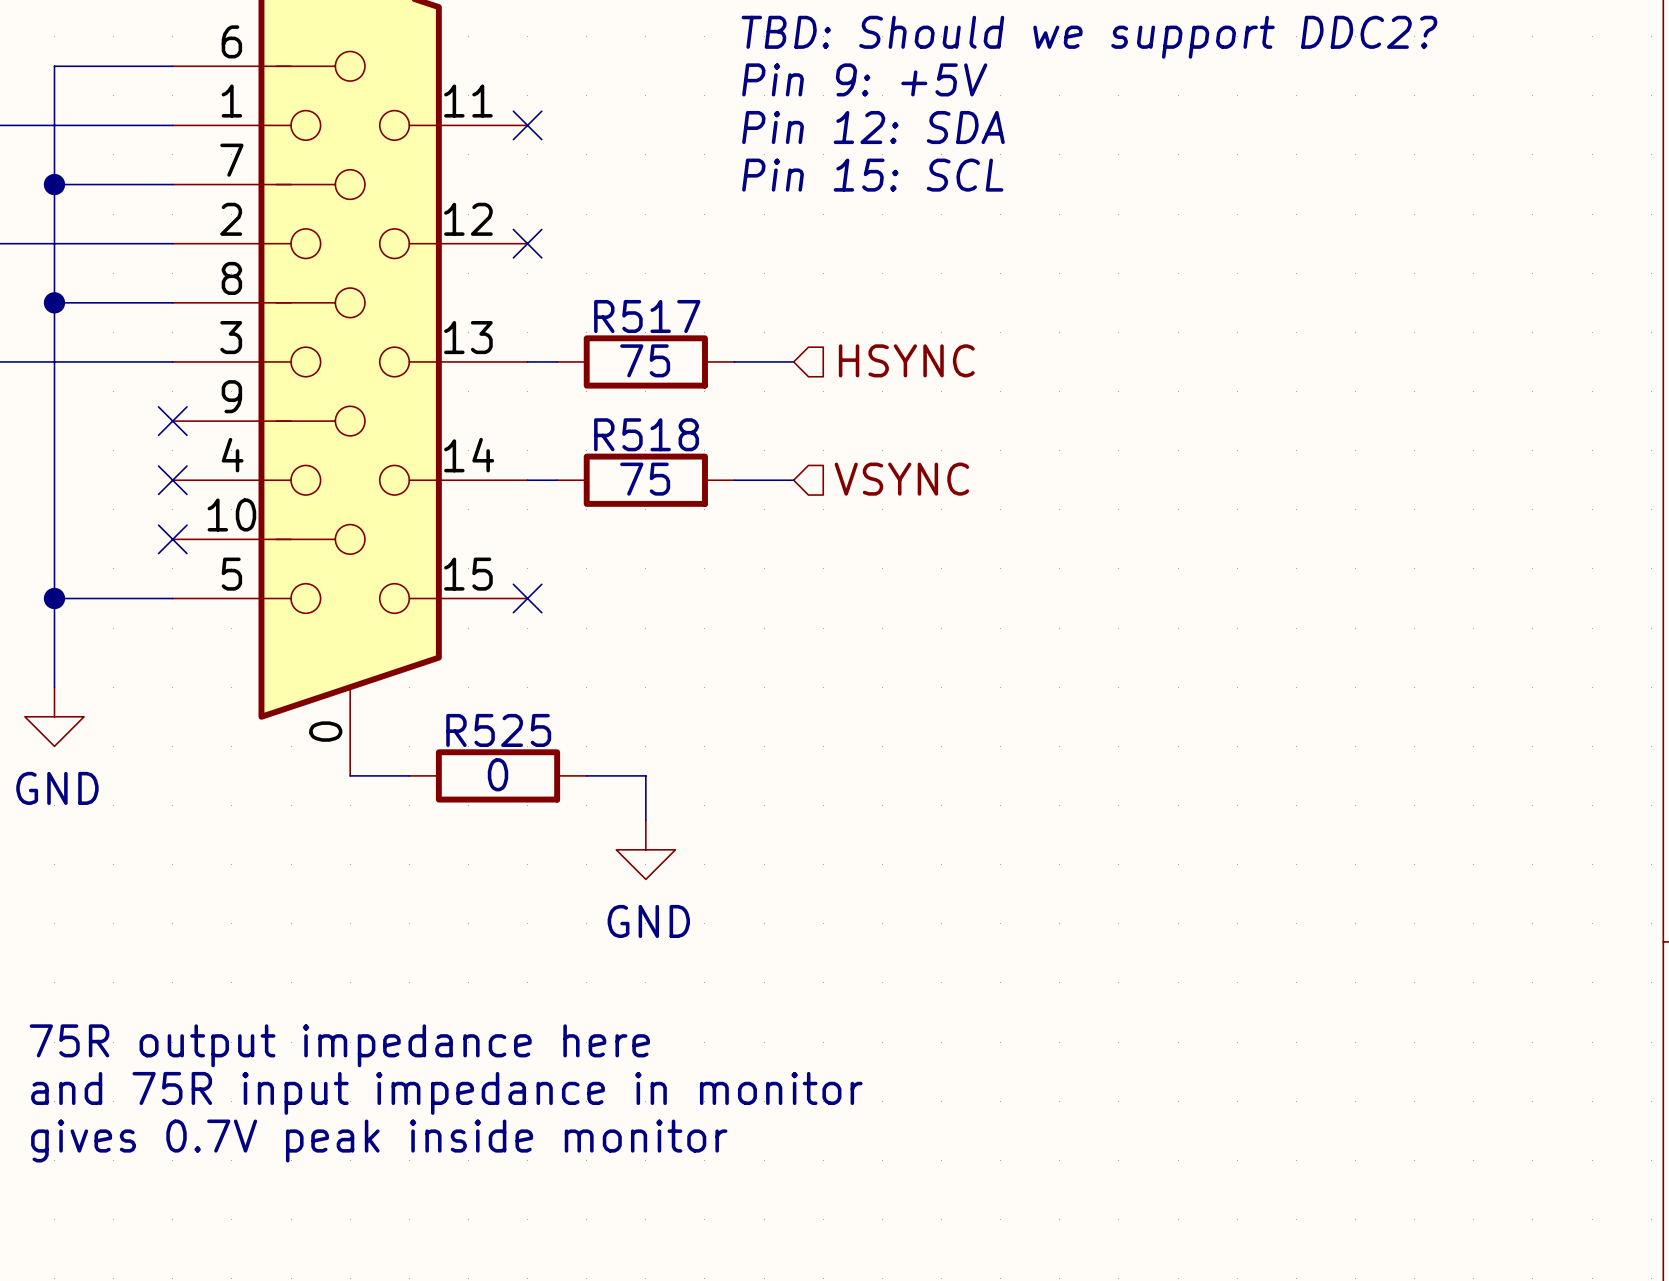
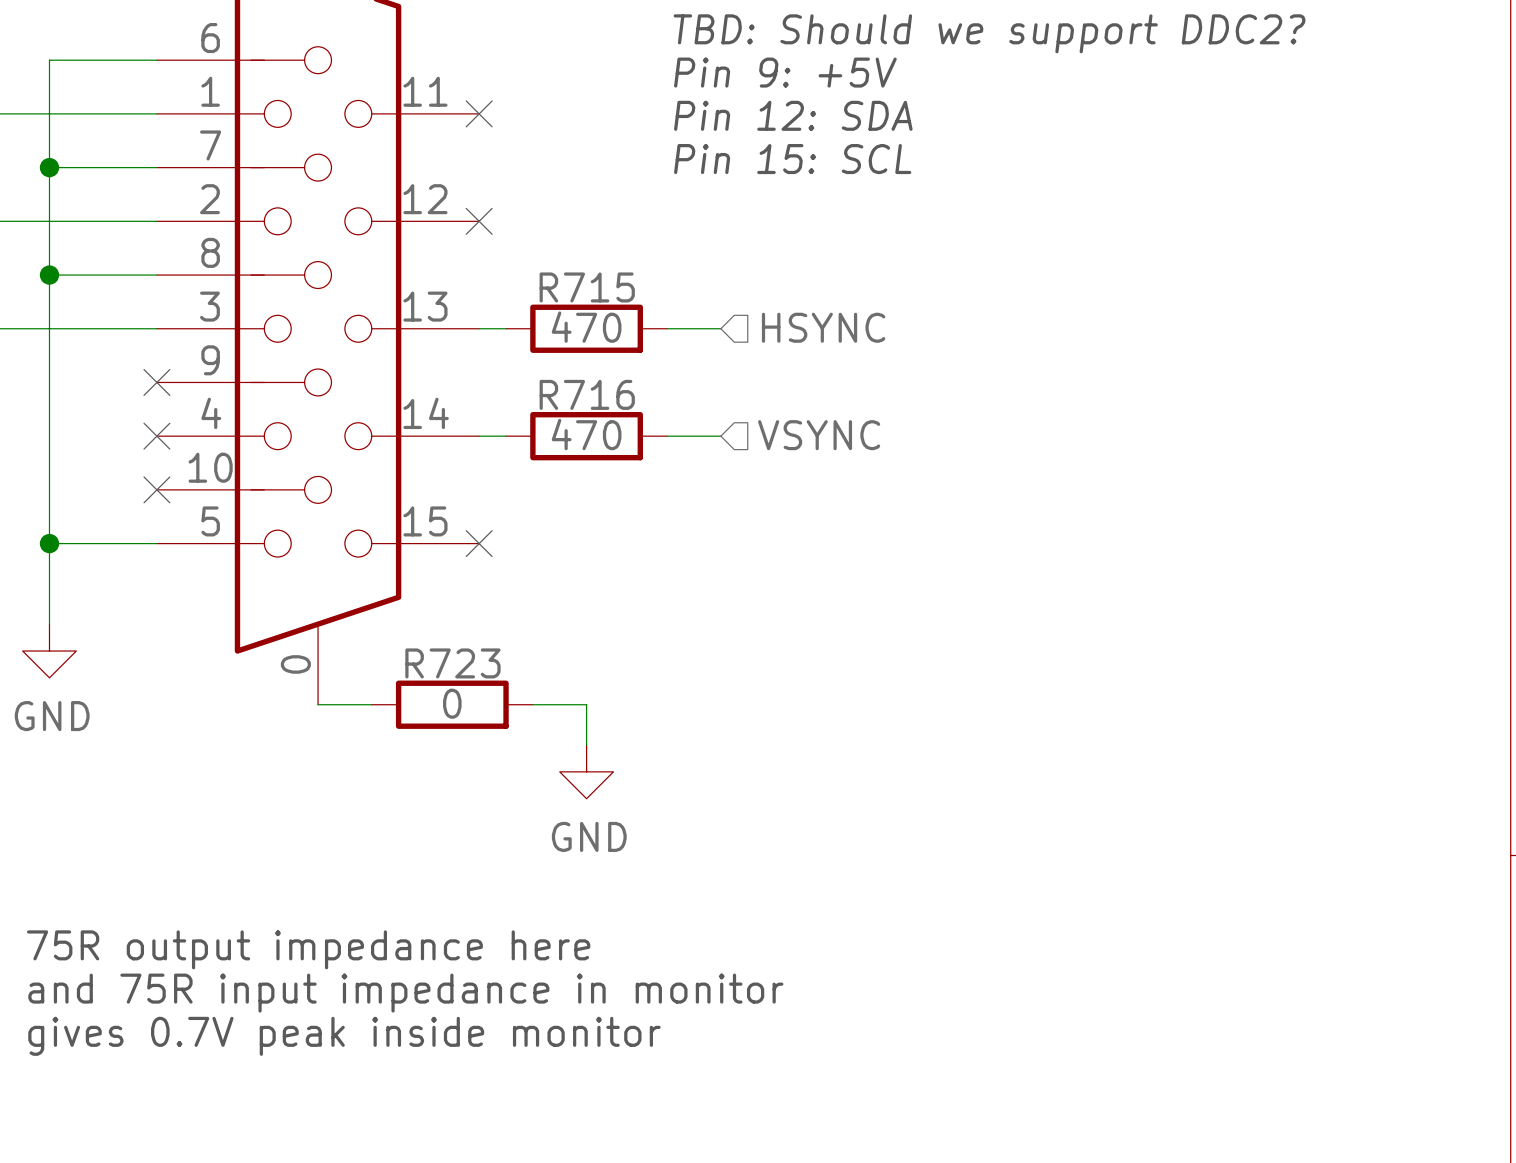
R517 name: R517 (647, 316) -> R715 (587, 287)
R517 value: 75 (645, 360) -> 470 (586, 327)
R518 name: R518 (646, 434) -> R716 (587, 394)
R518 value: 75 (645, 479) -> 470 (586, 434)
R525 name: R525 (498, 730) -> R723 (452, 663)

